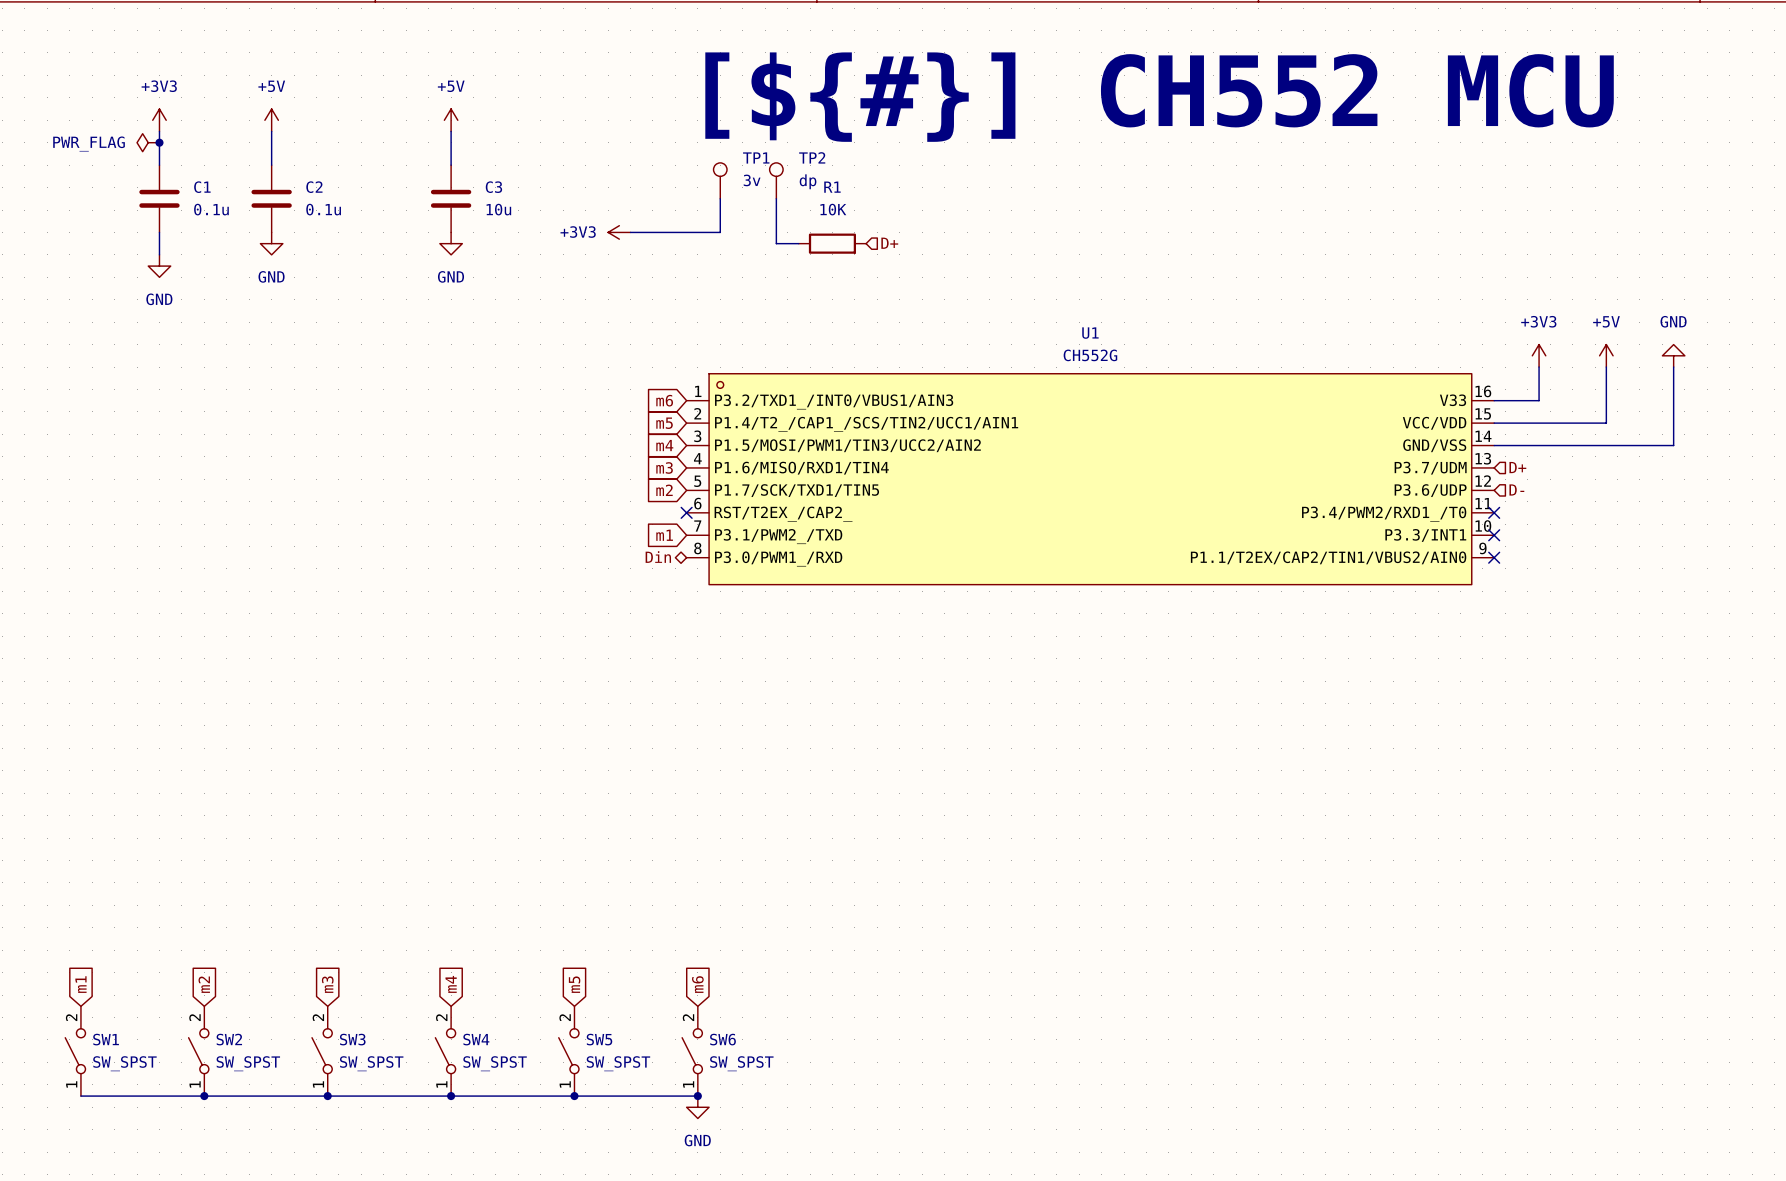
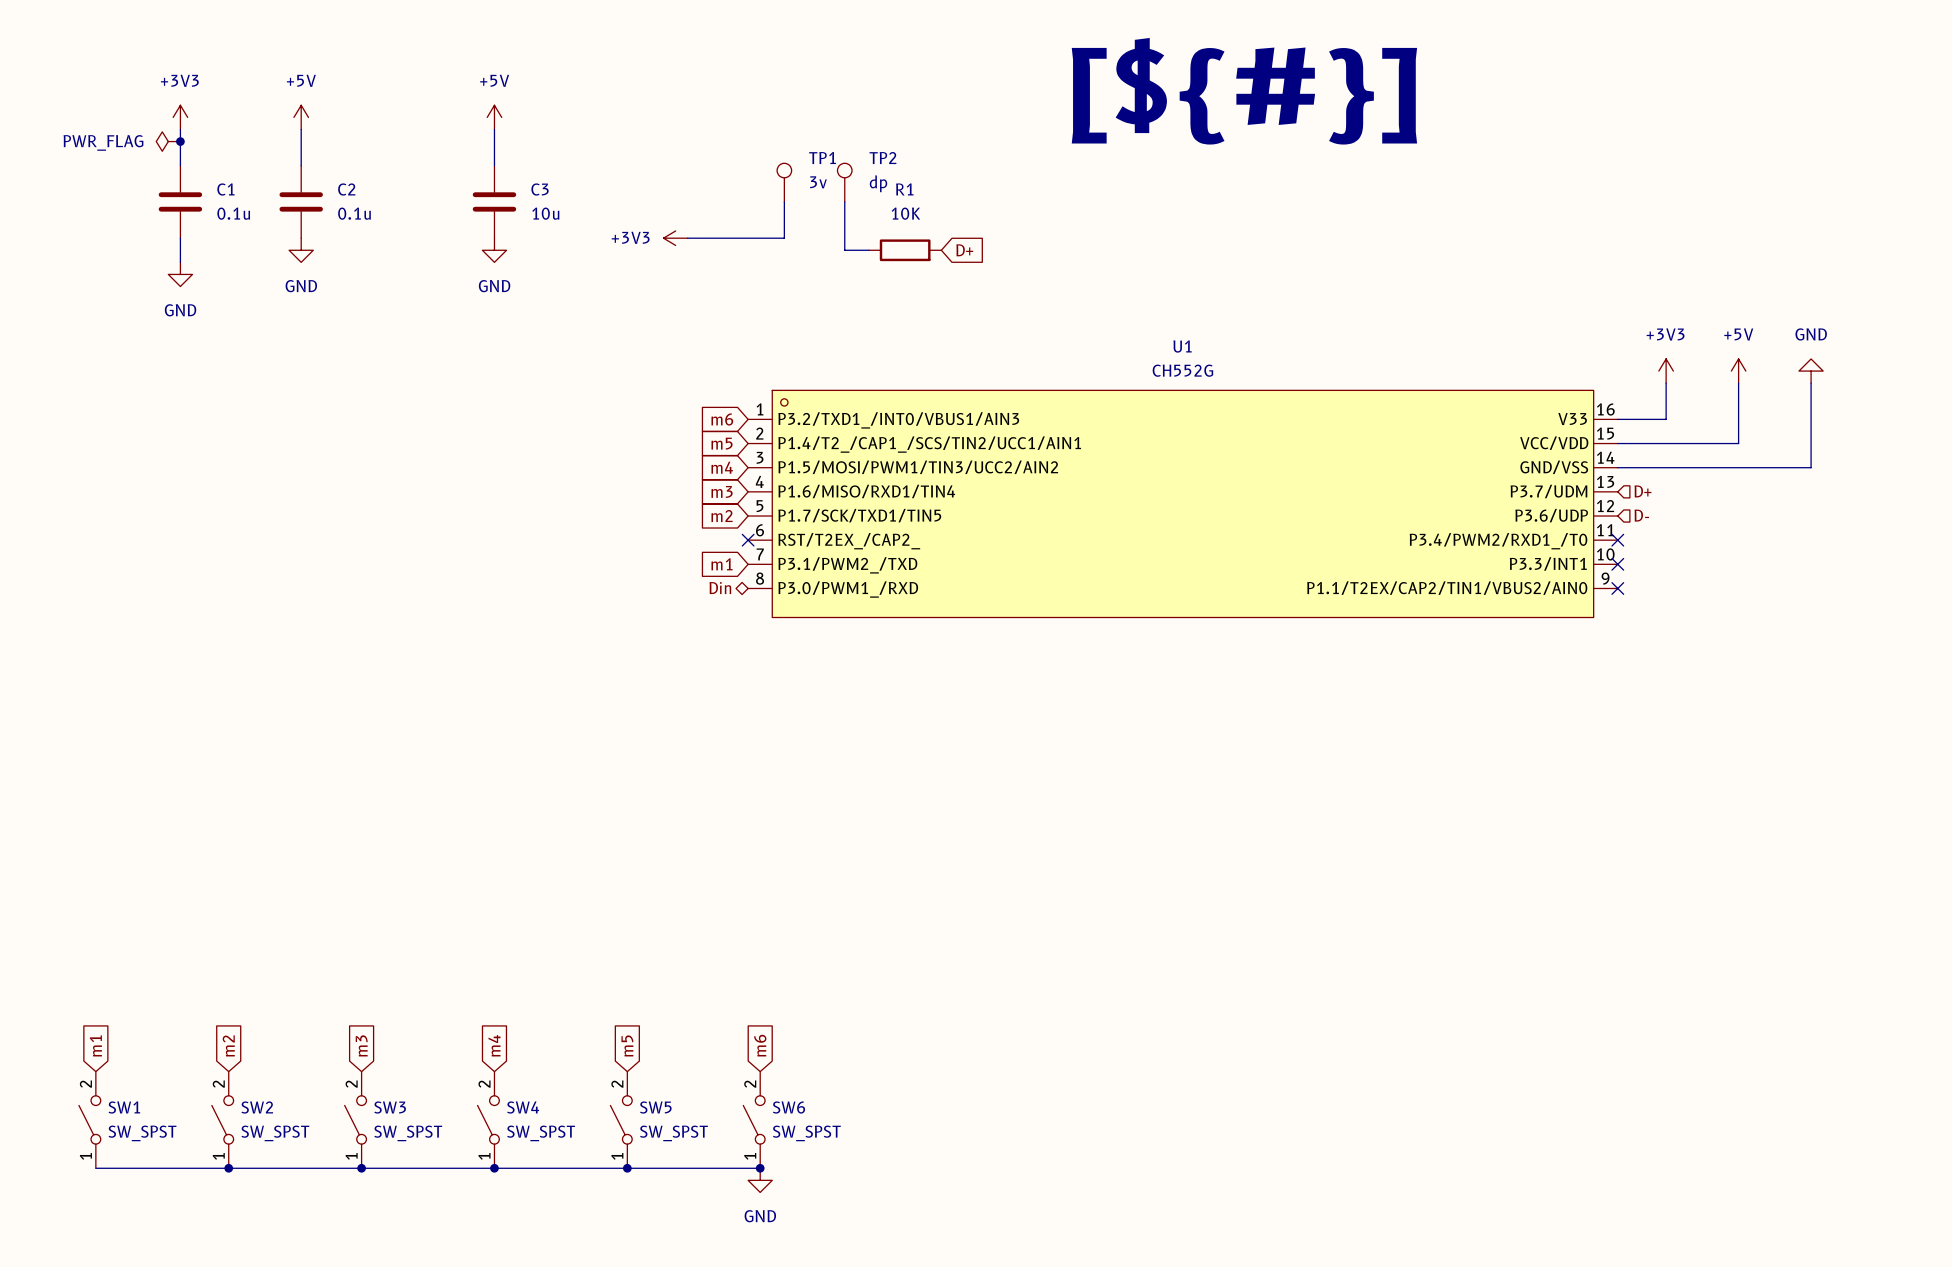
text: [${#}] CH552 MCU (1159, 97) -> [${#}] (1244, 91)
global label: none -> D+ (964, 250)
hierarchical label: D+ (889, 243) -> none

